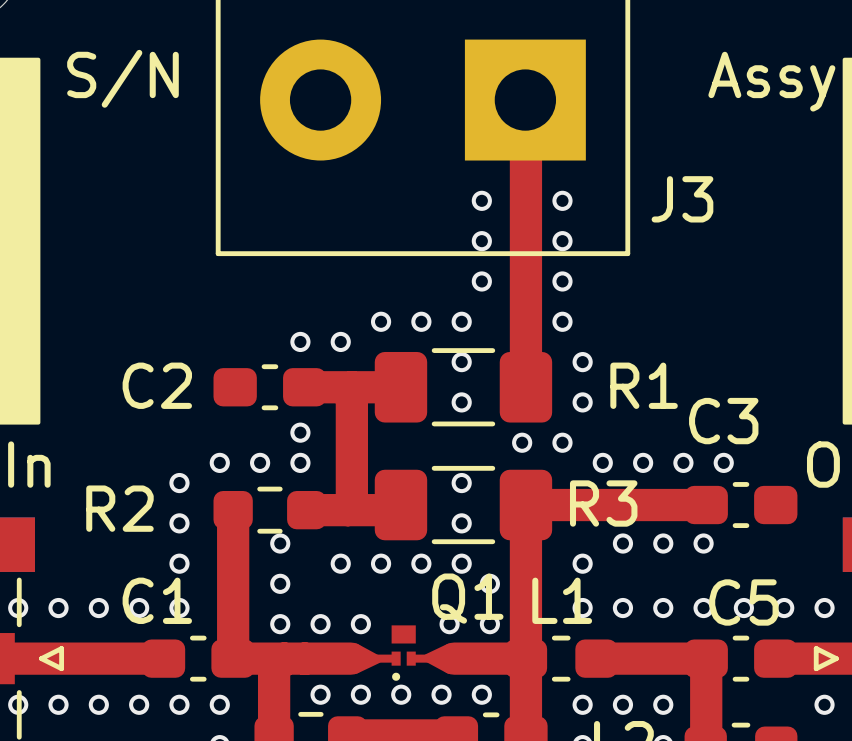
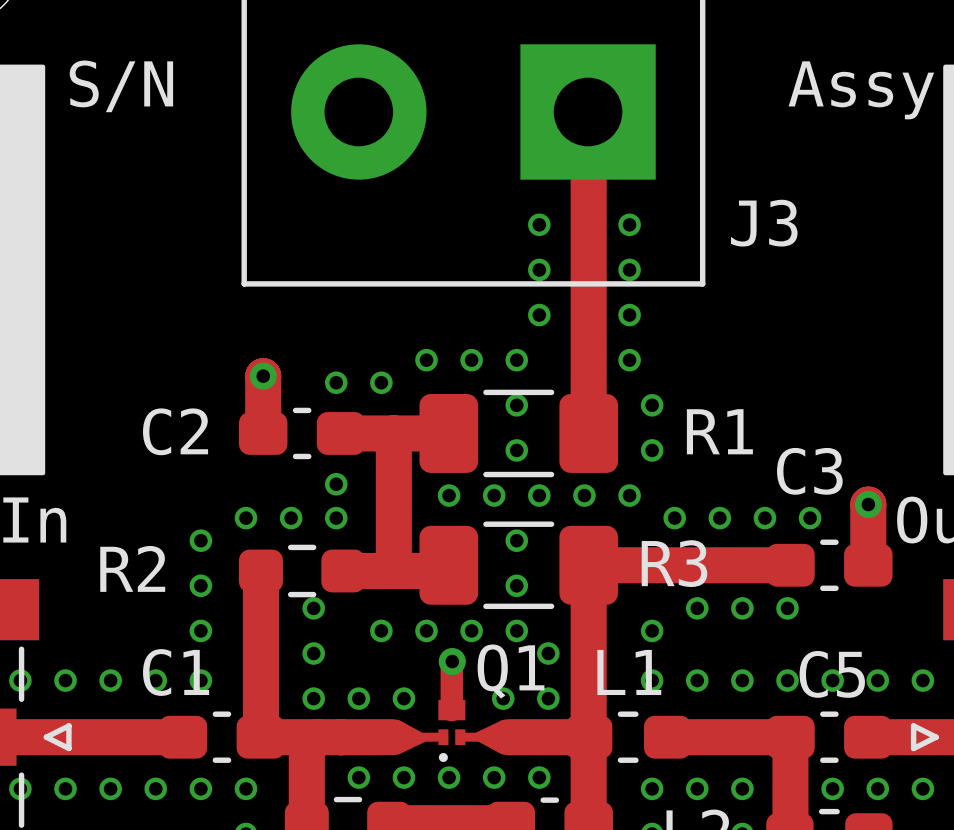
top track: none -> (263, 376) (263, 433)
via: none -> (263, 376)
via: none -> (449, 495)
via: none -> (494, 495)
via: none -> (539, 495)
top track: none -> (868, 504) (868, 565)
via: none -> (868, 504)
top track: none -> (451, 661) (451, 710)
via: none -> (452, 661)
via: none -> (832, 788)
via: none -> (877, 788)

